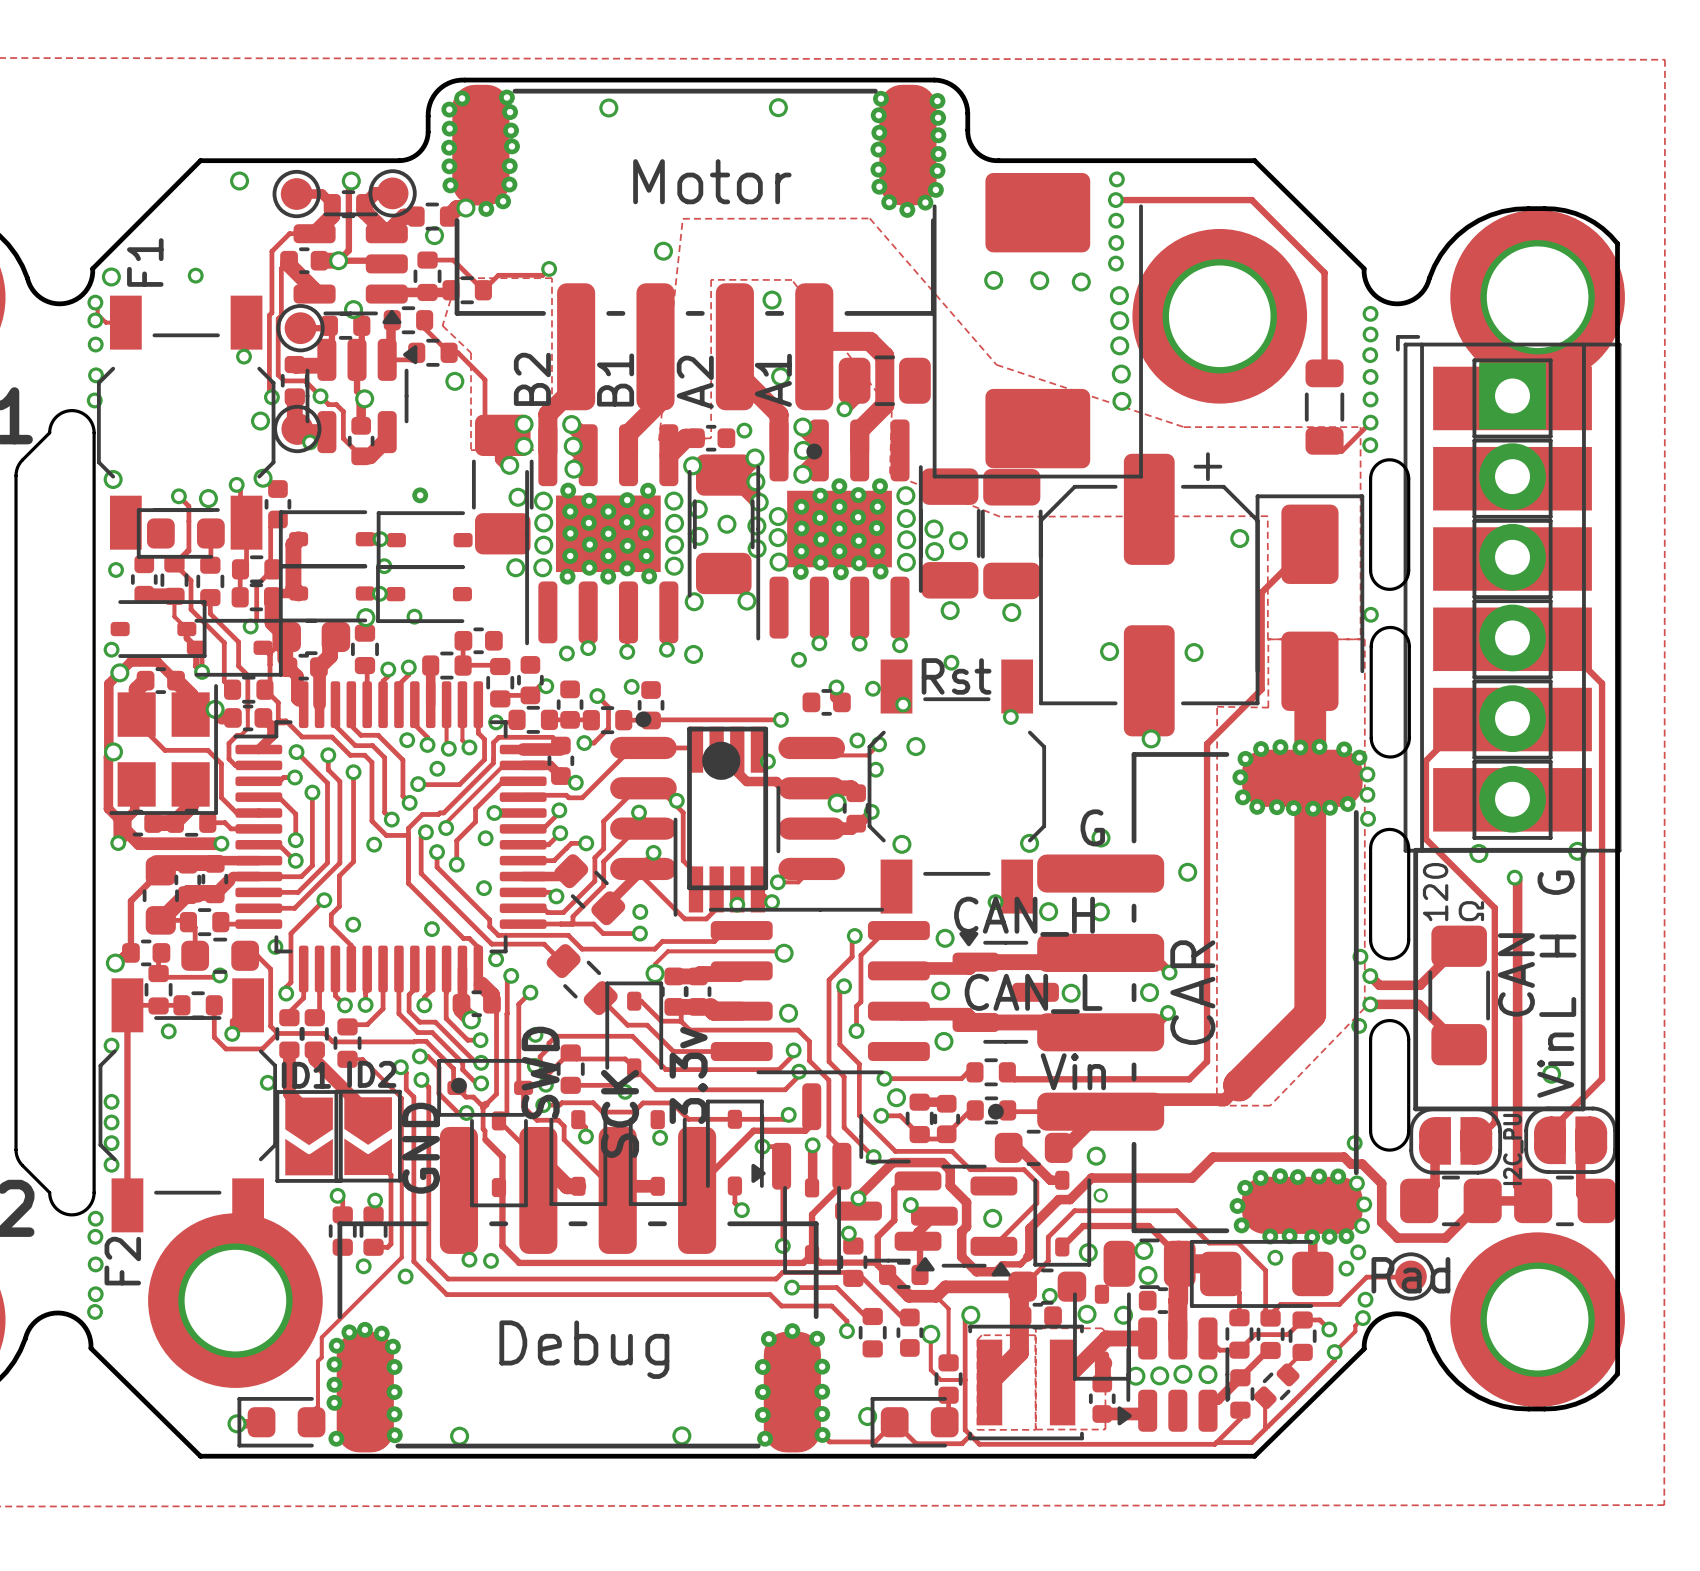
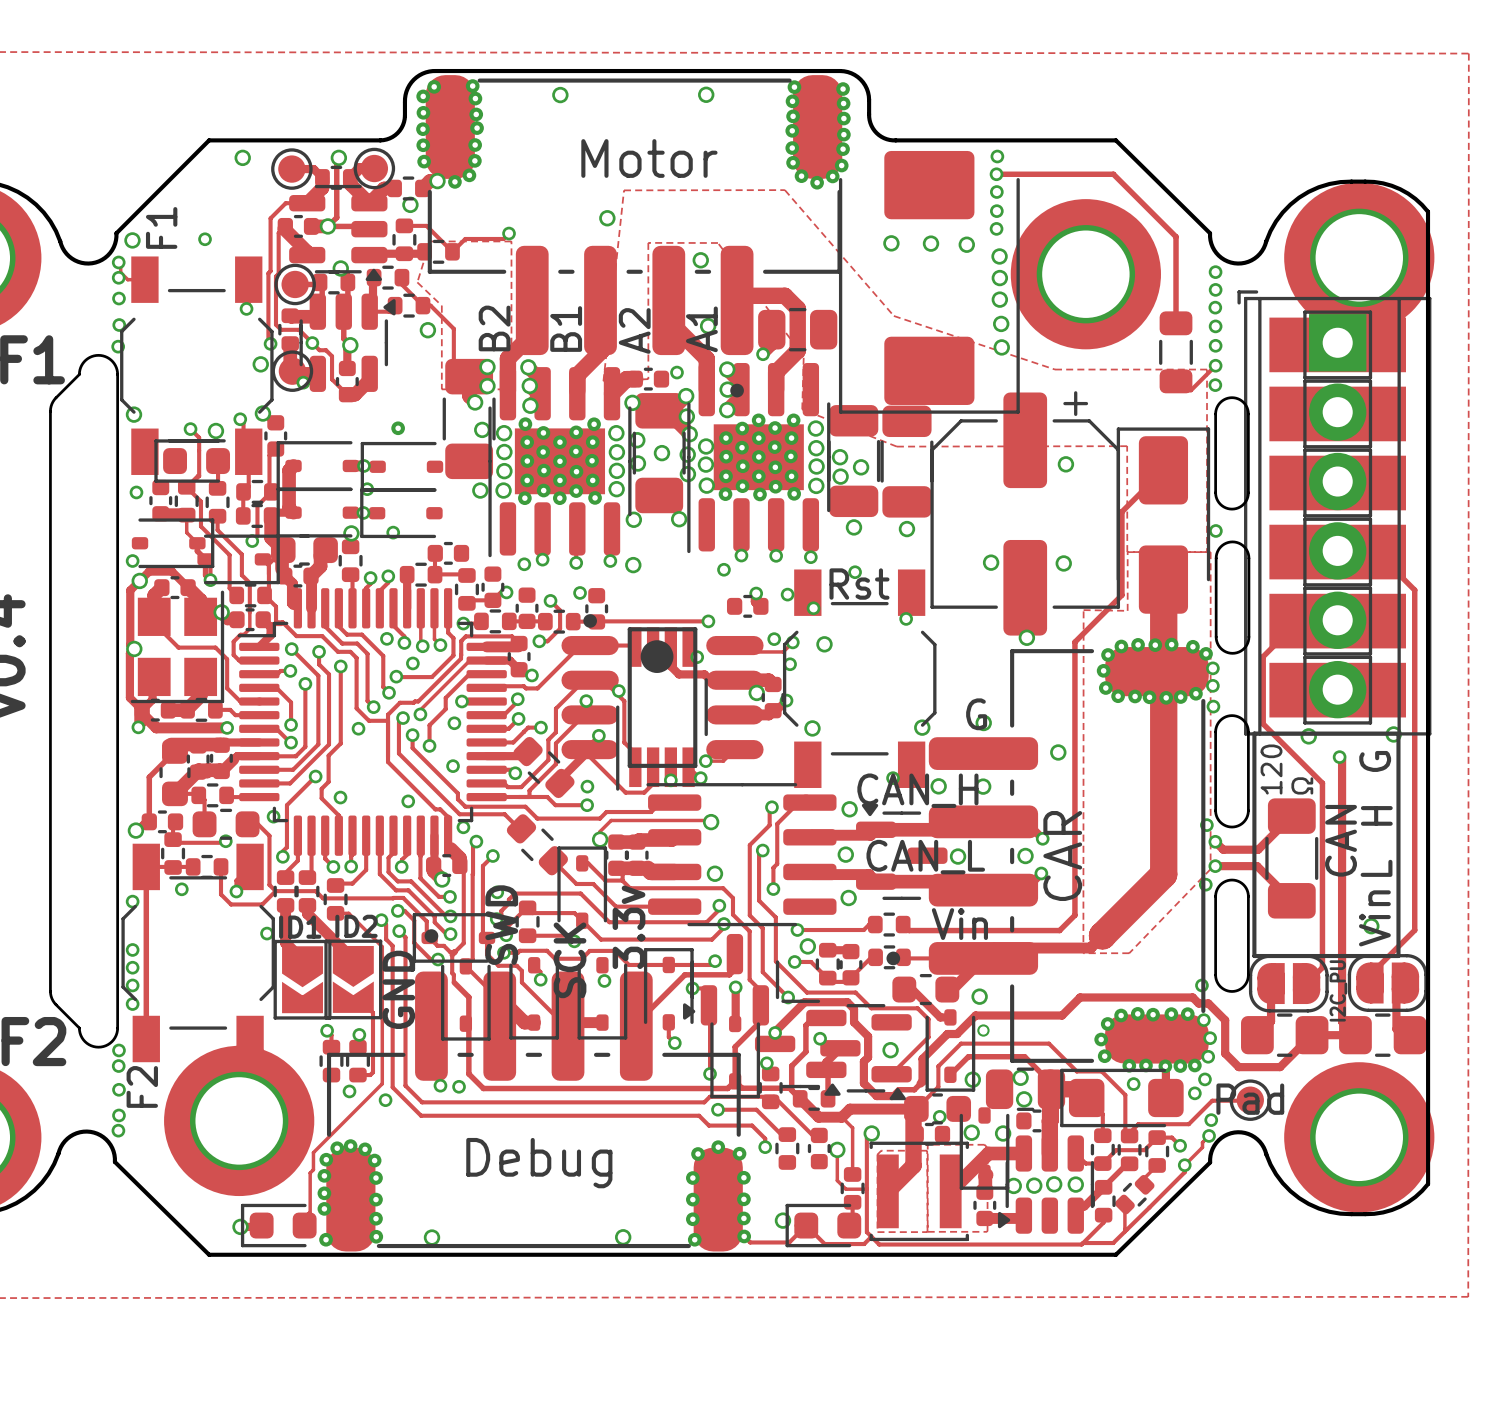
via position: (1239, 538) -> (1065, 464)

